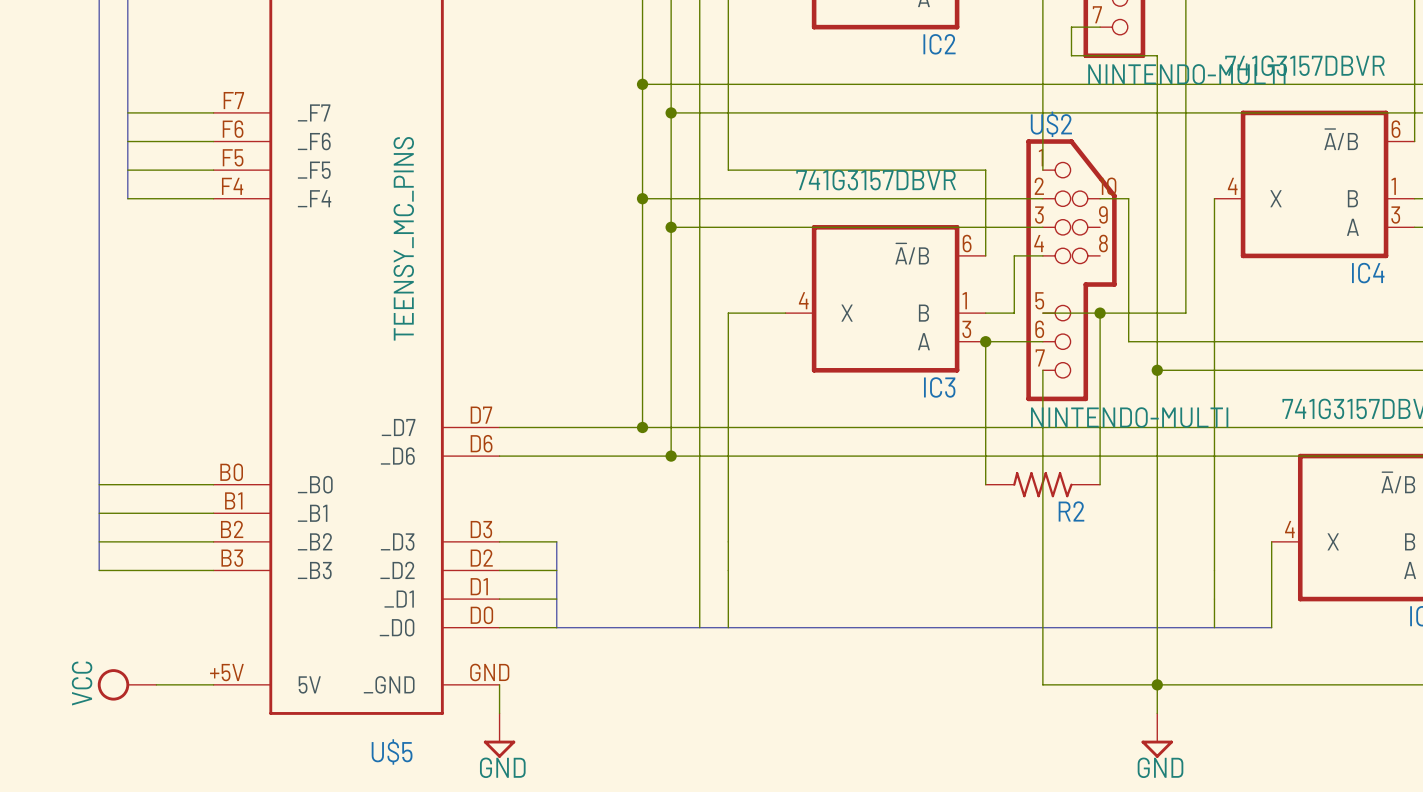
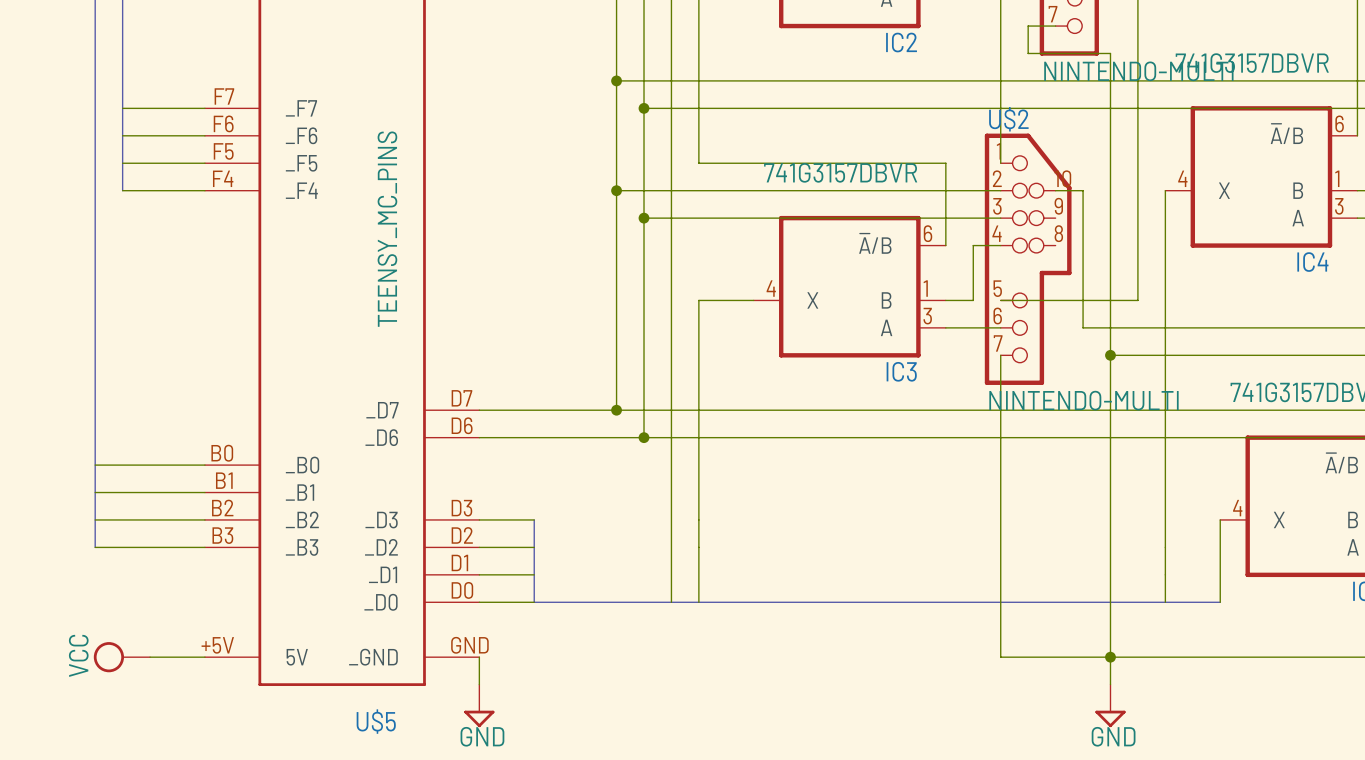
wire: (1100, 313) (1100, 484) -> none
junction: (1100, 313) -> none
wire: (985, 341) (985, 484) -> none
junction: (985, 341) -> none
R2: (1042, 484) -> none

